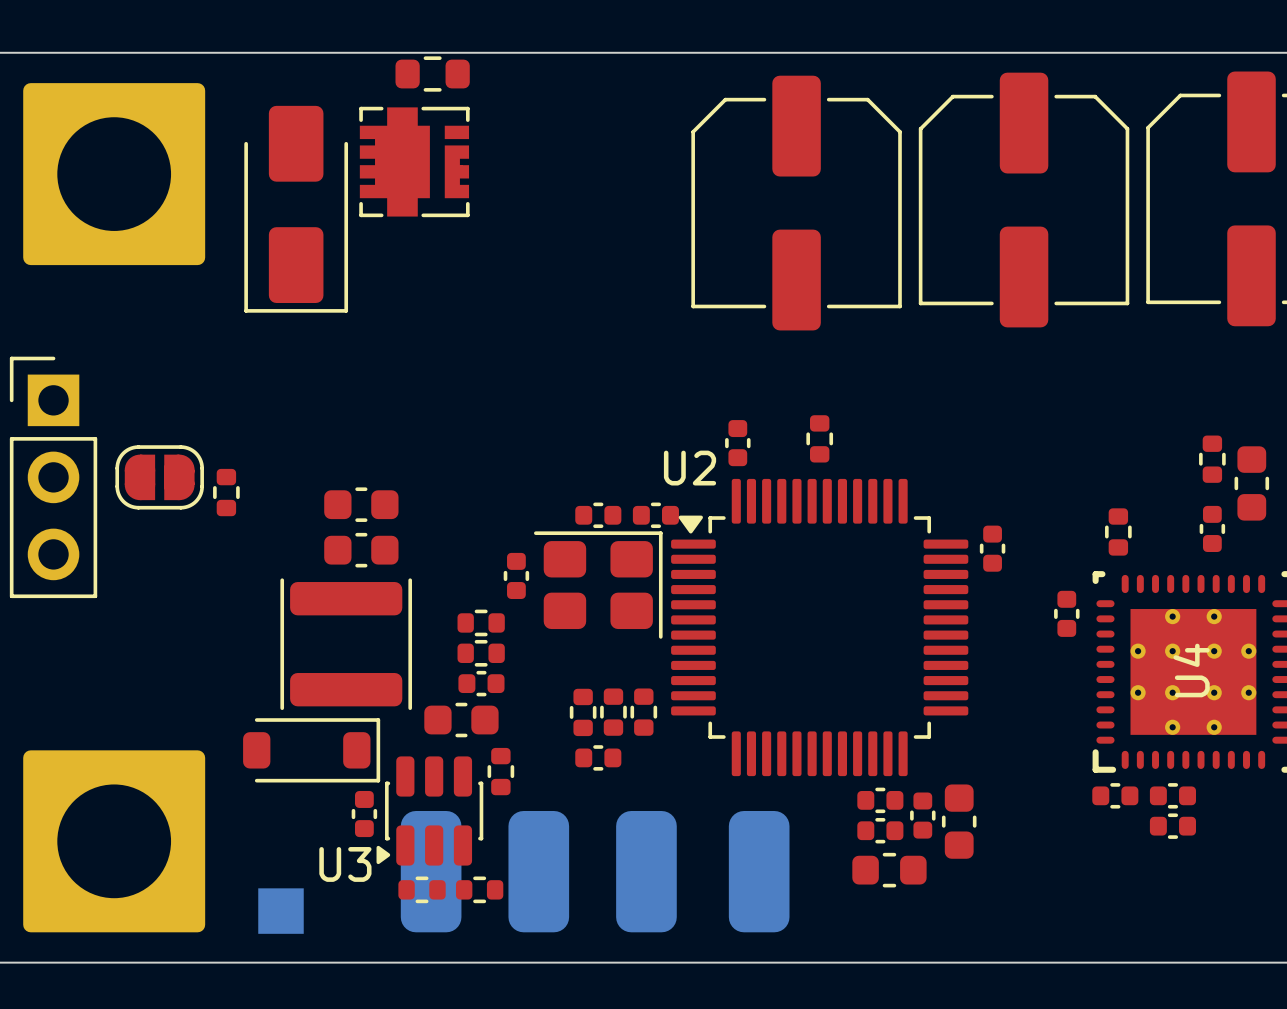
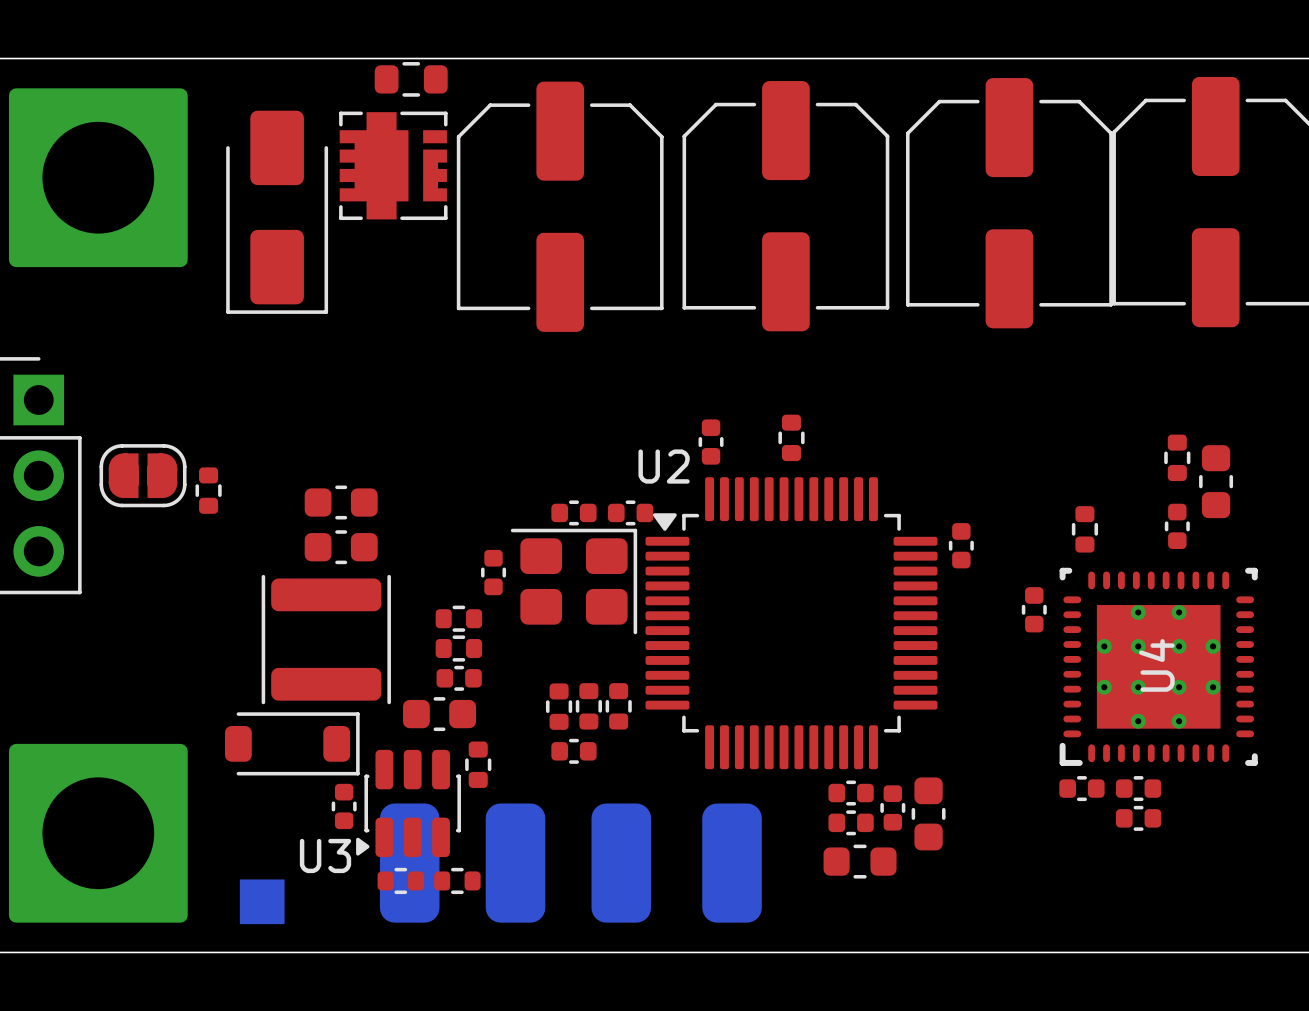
part position: (1024, 200) -> (1009, 203)
part: none -> (560, 206)
part position: (796, 203) -> (785, 206)

